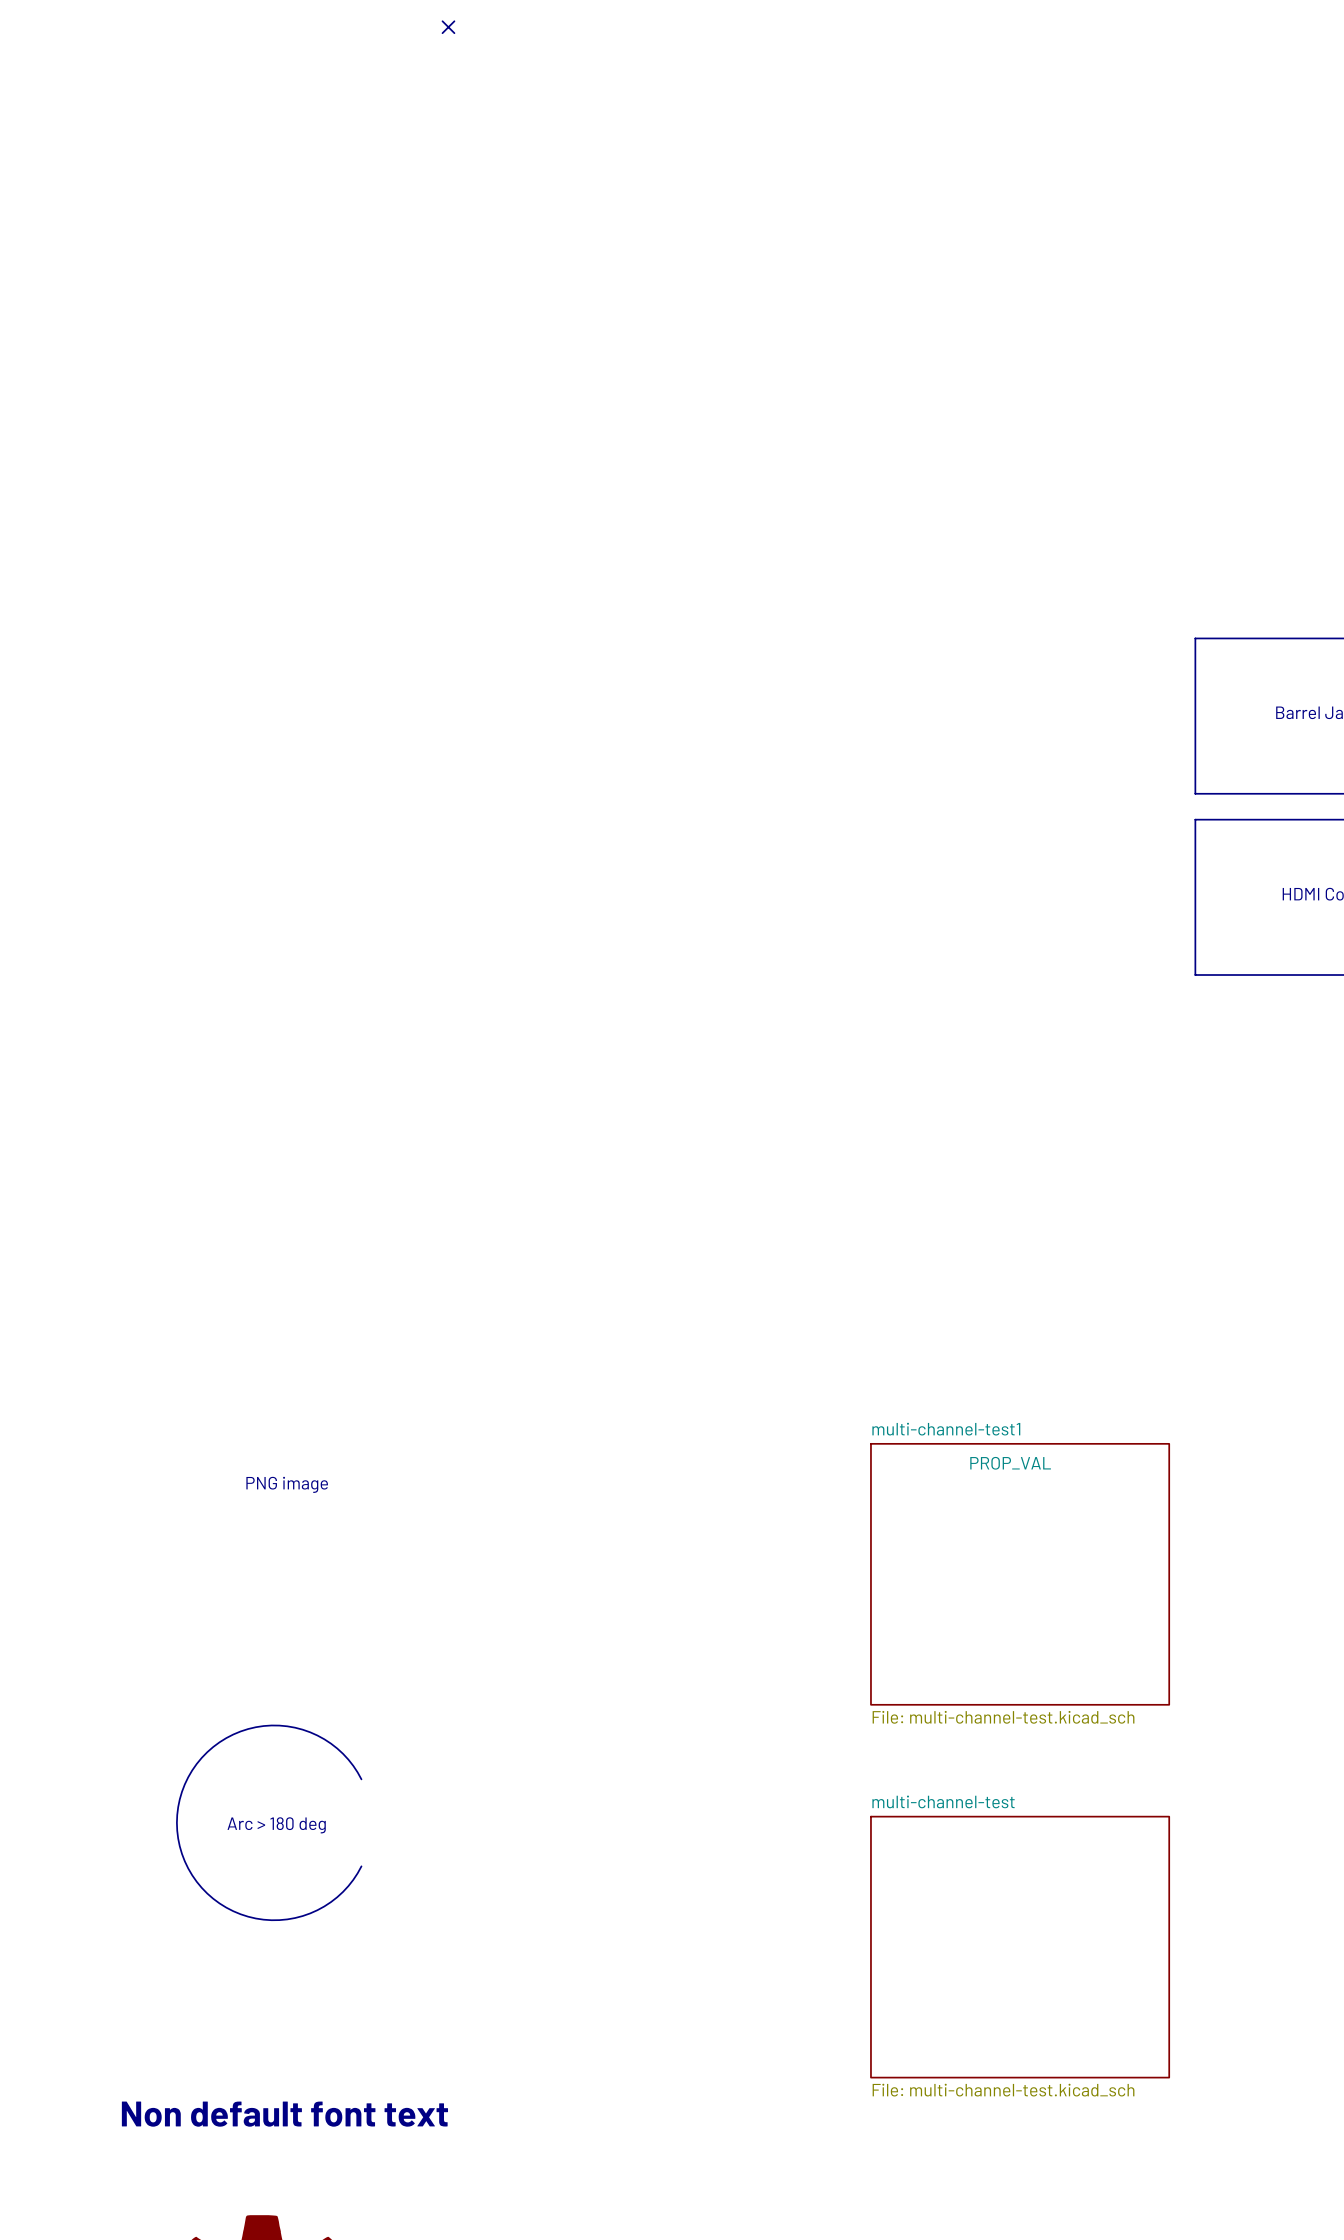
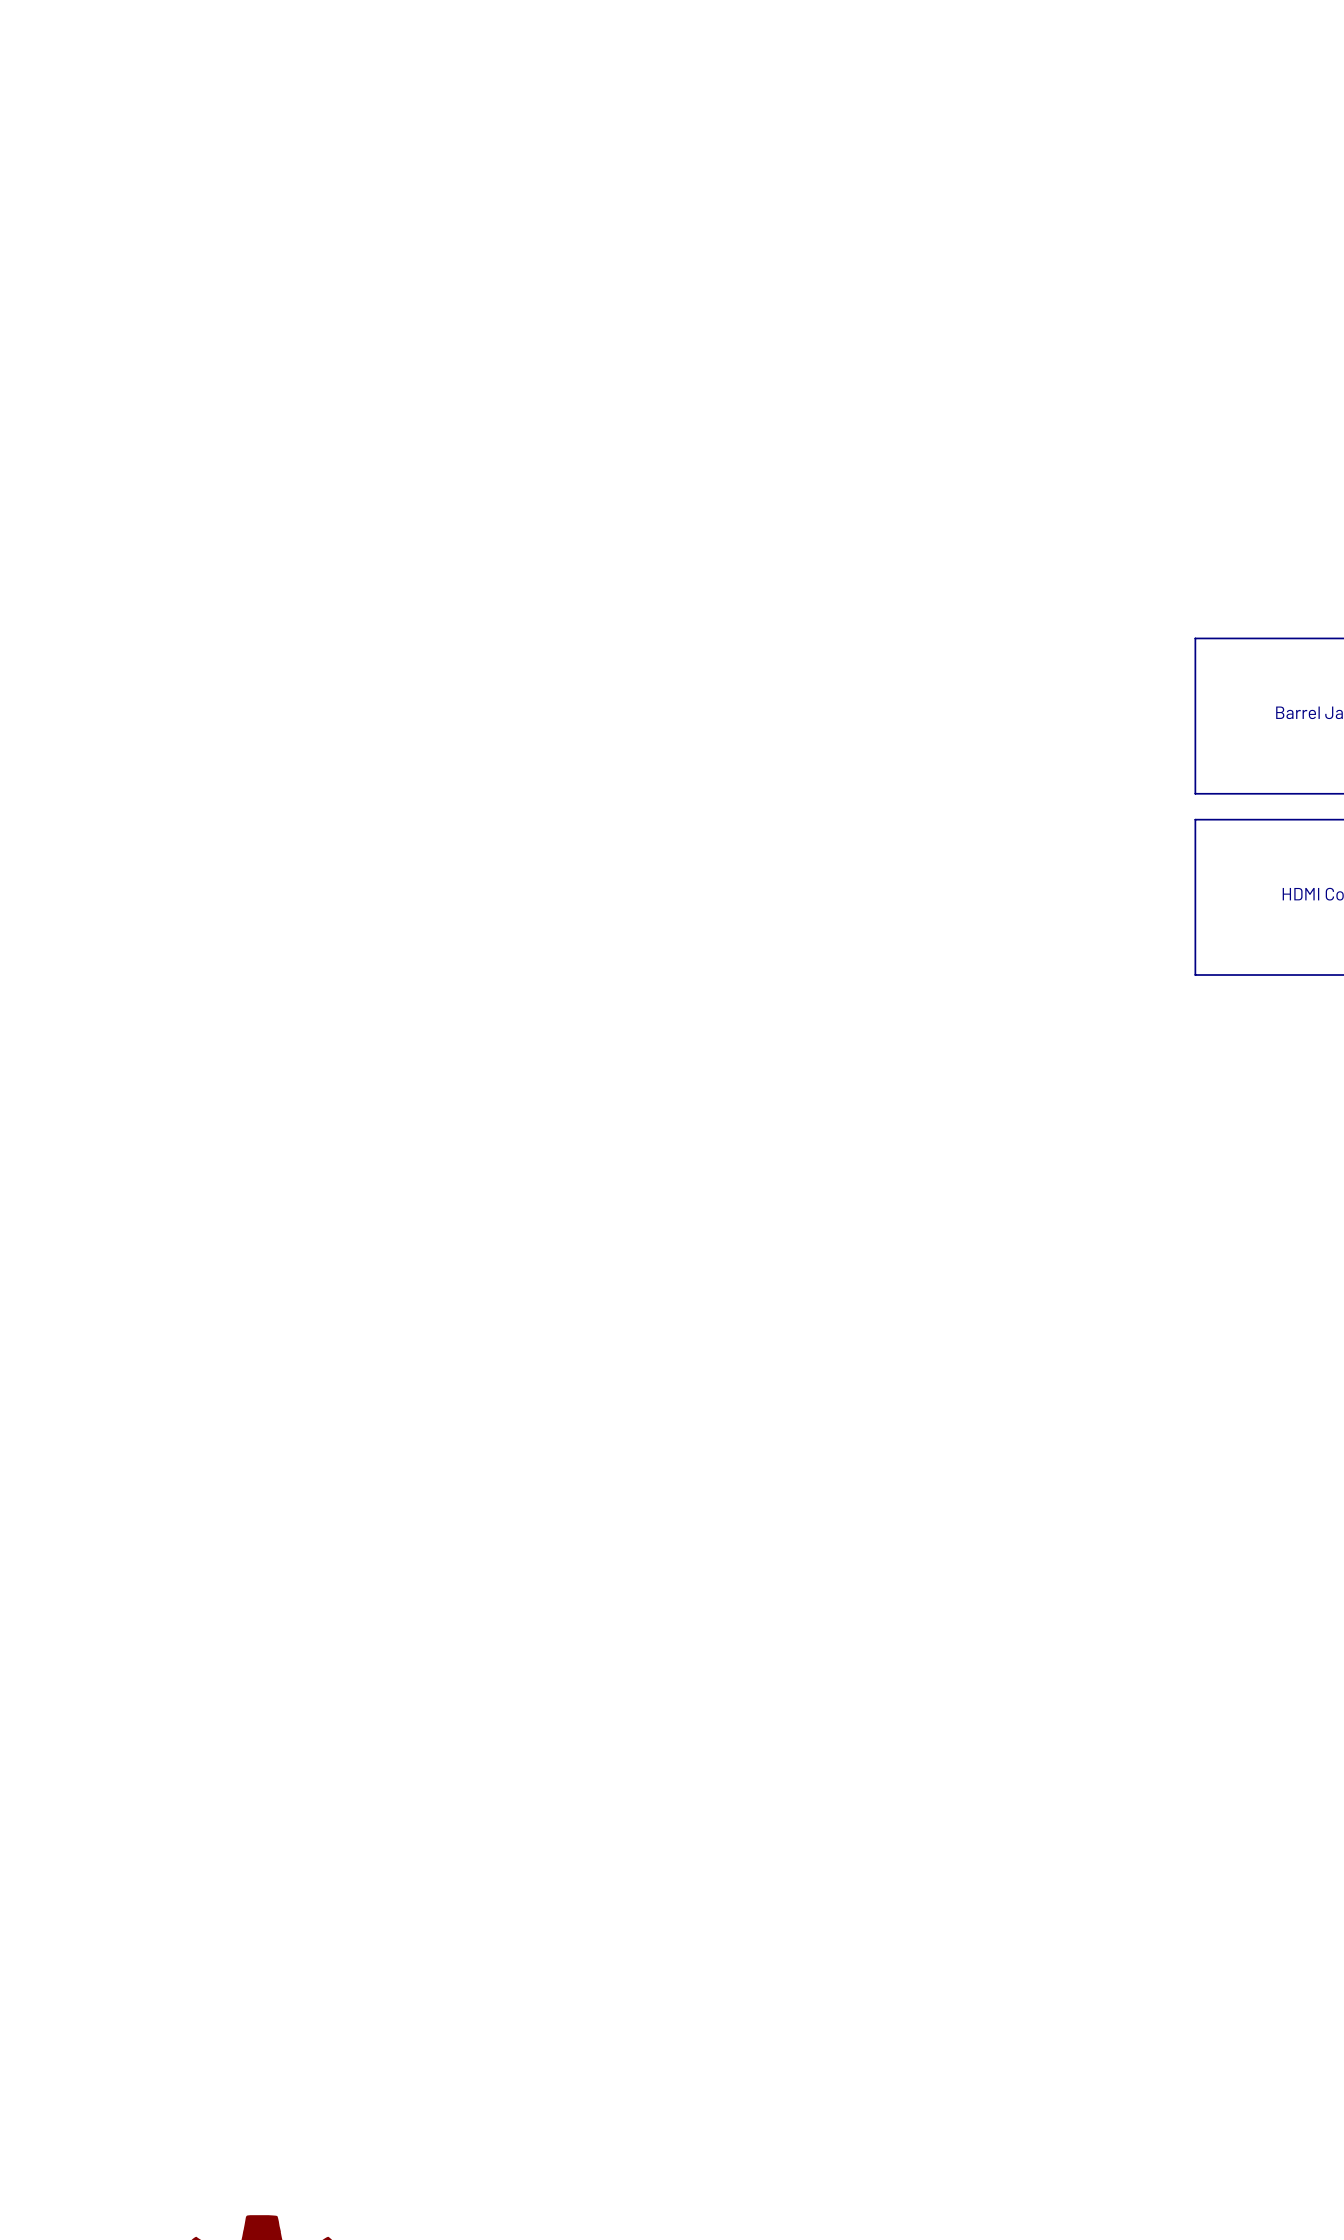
no-connect mark: (448, 27) -> none
text: PNG image (287, 1484) -> none
sheet multi-channel-test1: File: multi-channel-test.kicad_sch (1020, 1574) -> none
line: (361, 1779) (343, 1753) (317, 1735) (287, 1726) (255, 1727) (226, 1738) (201, 1757) (184, 1784) (179, 1799) (176, 1822) (178, 1838) (184, 1861) (201, 1887) (226, 1907) (255, 1918) (287, 1919) (317, 1910) (343, 1891) (361, 1866) -> none
text: Arc > 180 deg (276, 1825) -> none
sheet multi-channel-test: File: multi-channel-test.kicad_sch (1020, 1947) -> none
text: Non default font text (284, 2114) -> none

